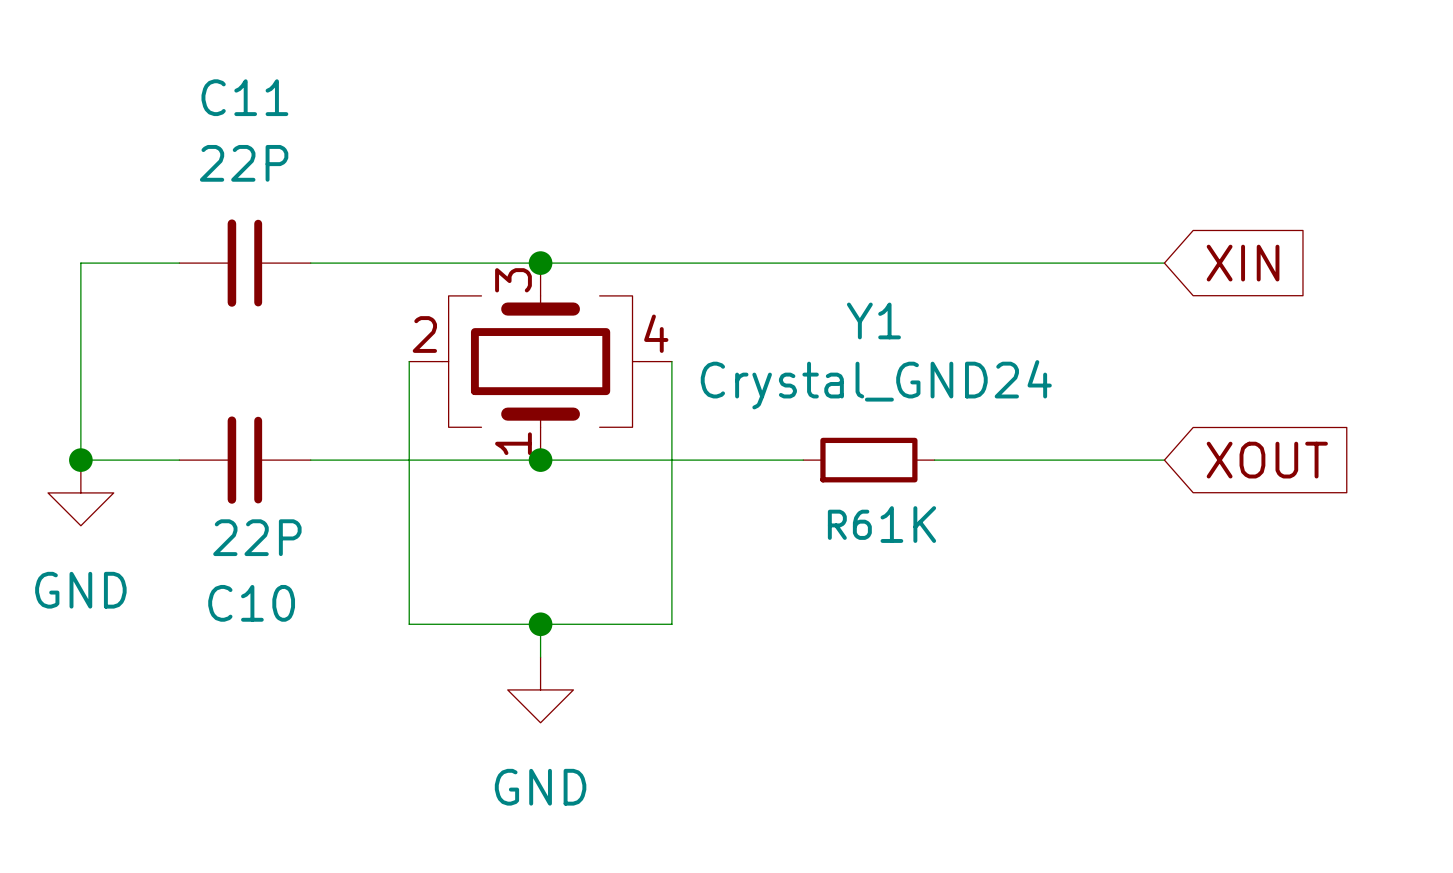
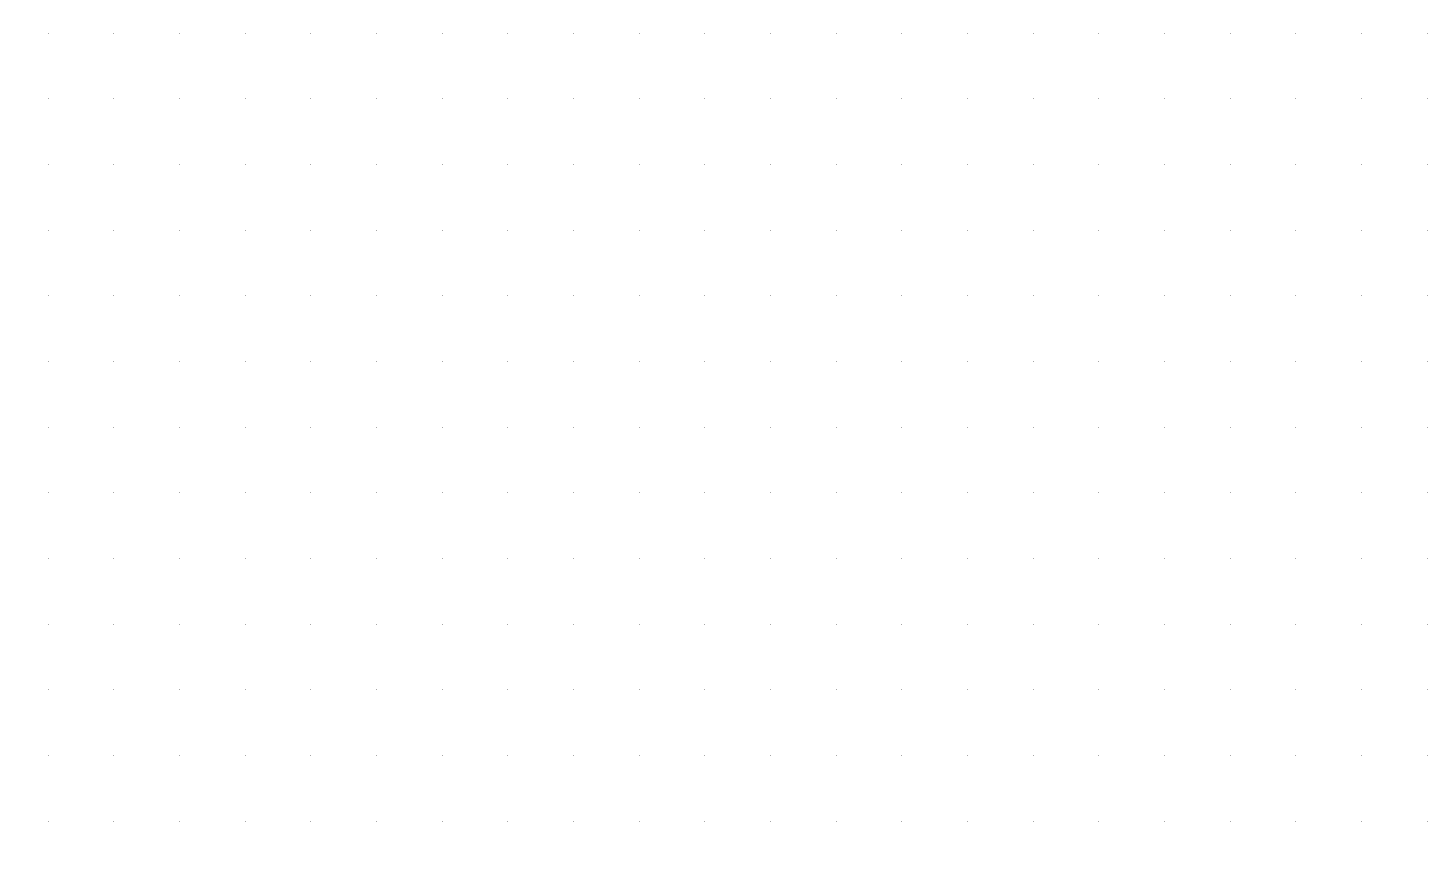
wire: (179, 263) (80, 263) (80, 460) (179, 460) -> none
C11: 22P (245, 263) -> none
wire: (310, 263) (1164, 263) -> none
junction: (540, 263) -> none
global label: XIN (1243, 263) -> none
wire: (409, 361) (409, 624) (671, 624) (671, 361) -> none
Y1: Crystal_GND24 (540, 361) -> none
junction: (80, 460) -> none
C10: 22P (245, 460) -> none
wire: (310, 460) (803, 460) -> none
junction: (540, 460) -> none
R6: 1K (868, 460) -> none
wire: (934, 460) (1164, 460) -> none
global label: XOUT (1267, 460) -> none
power symbol: GND (80, 492) -> none
wire: (540, 624) (540, 657) -> none
junction: (540, 624) -> none
power symbol: GND (540, 689) -> none

